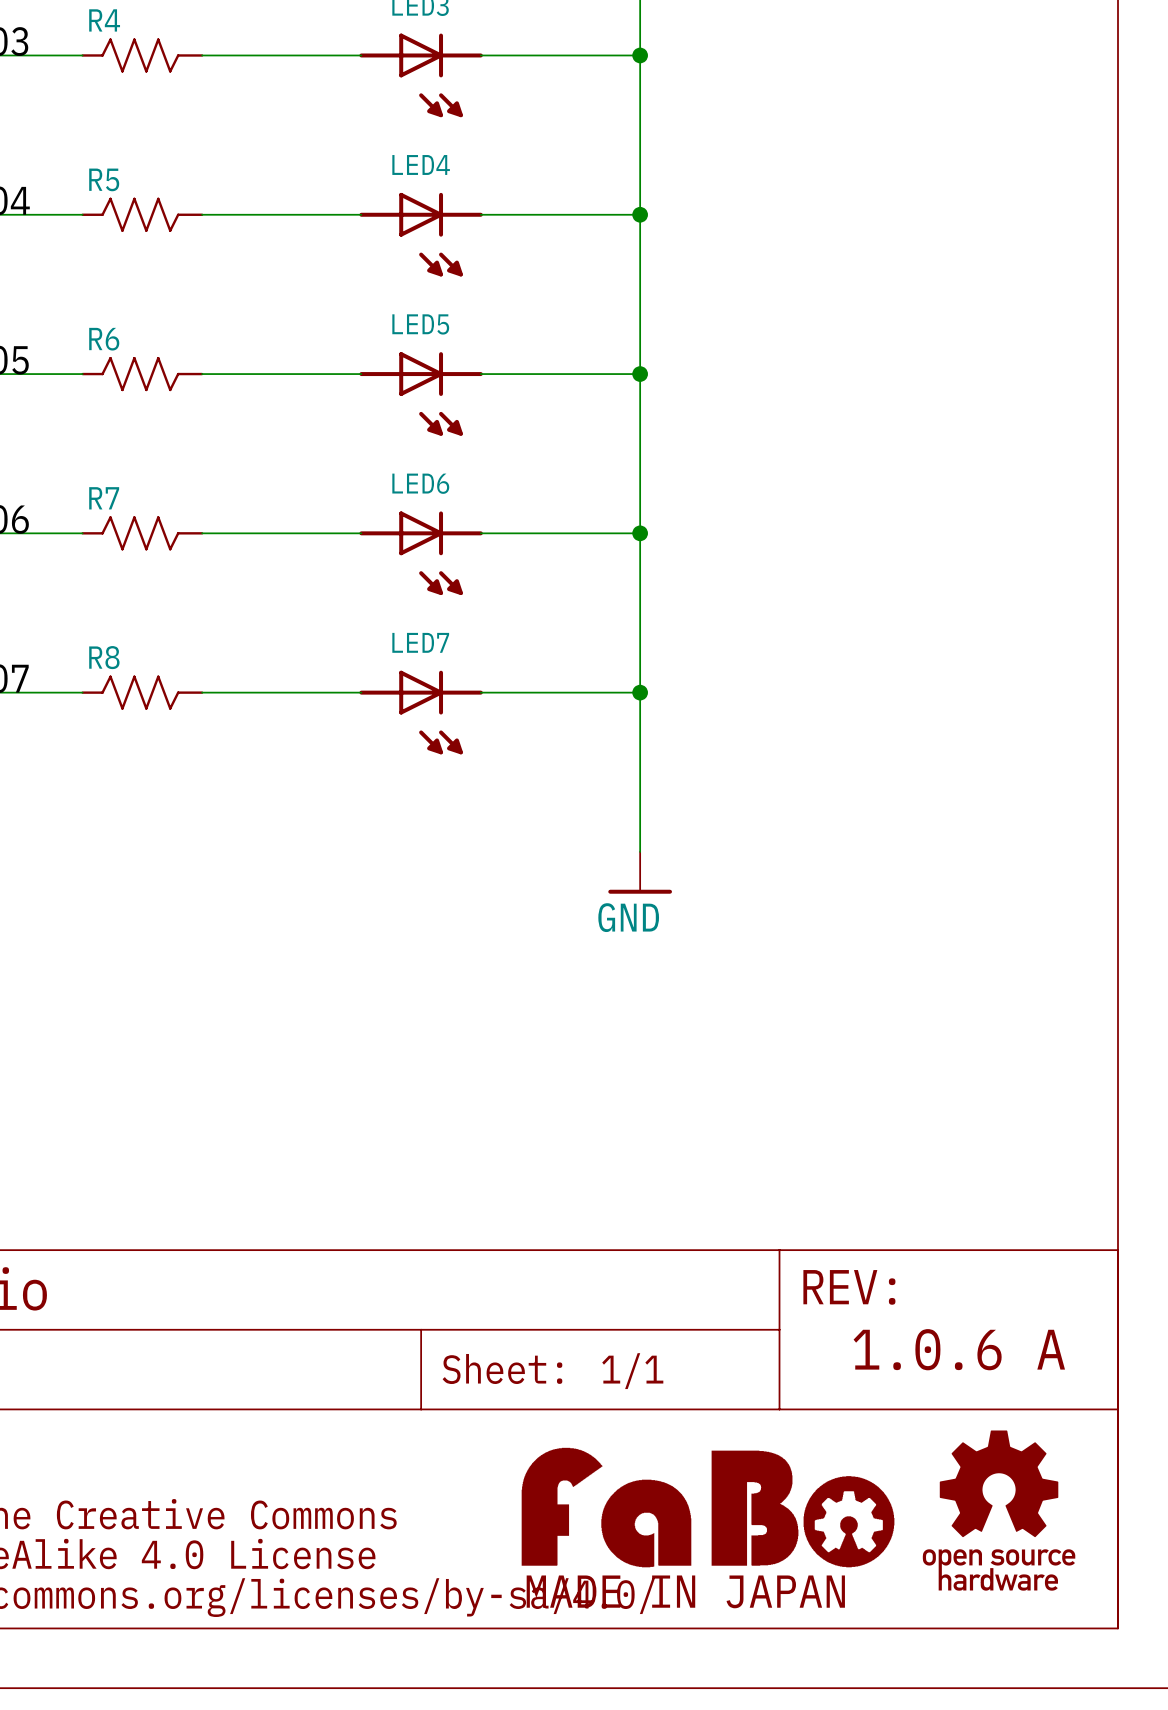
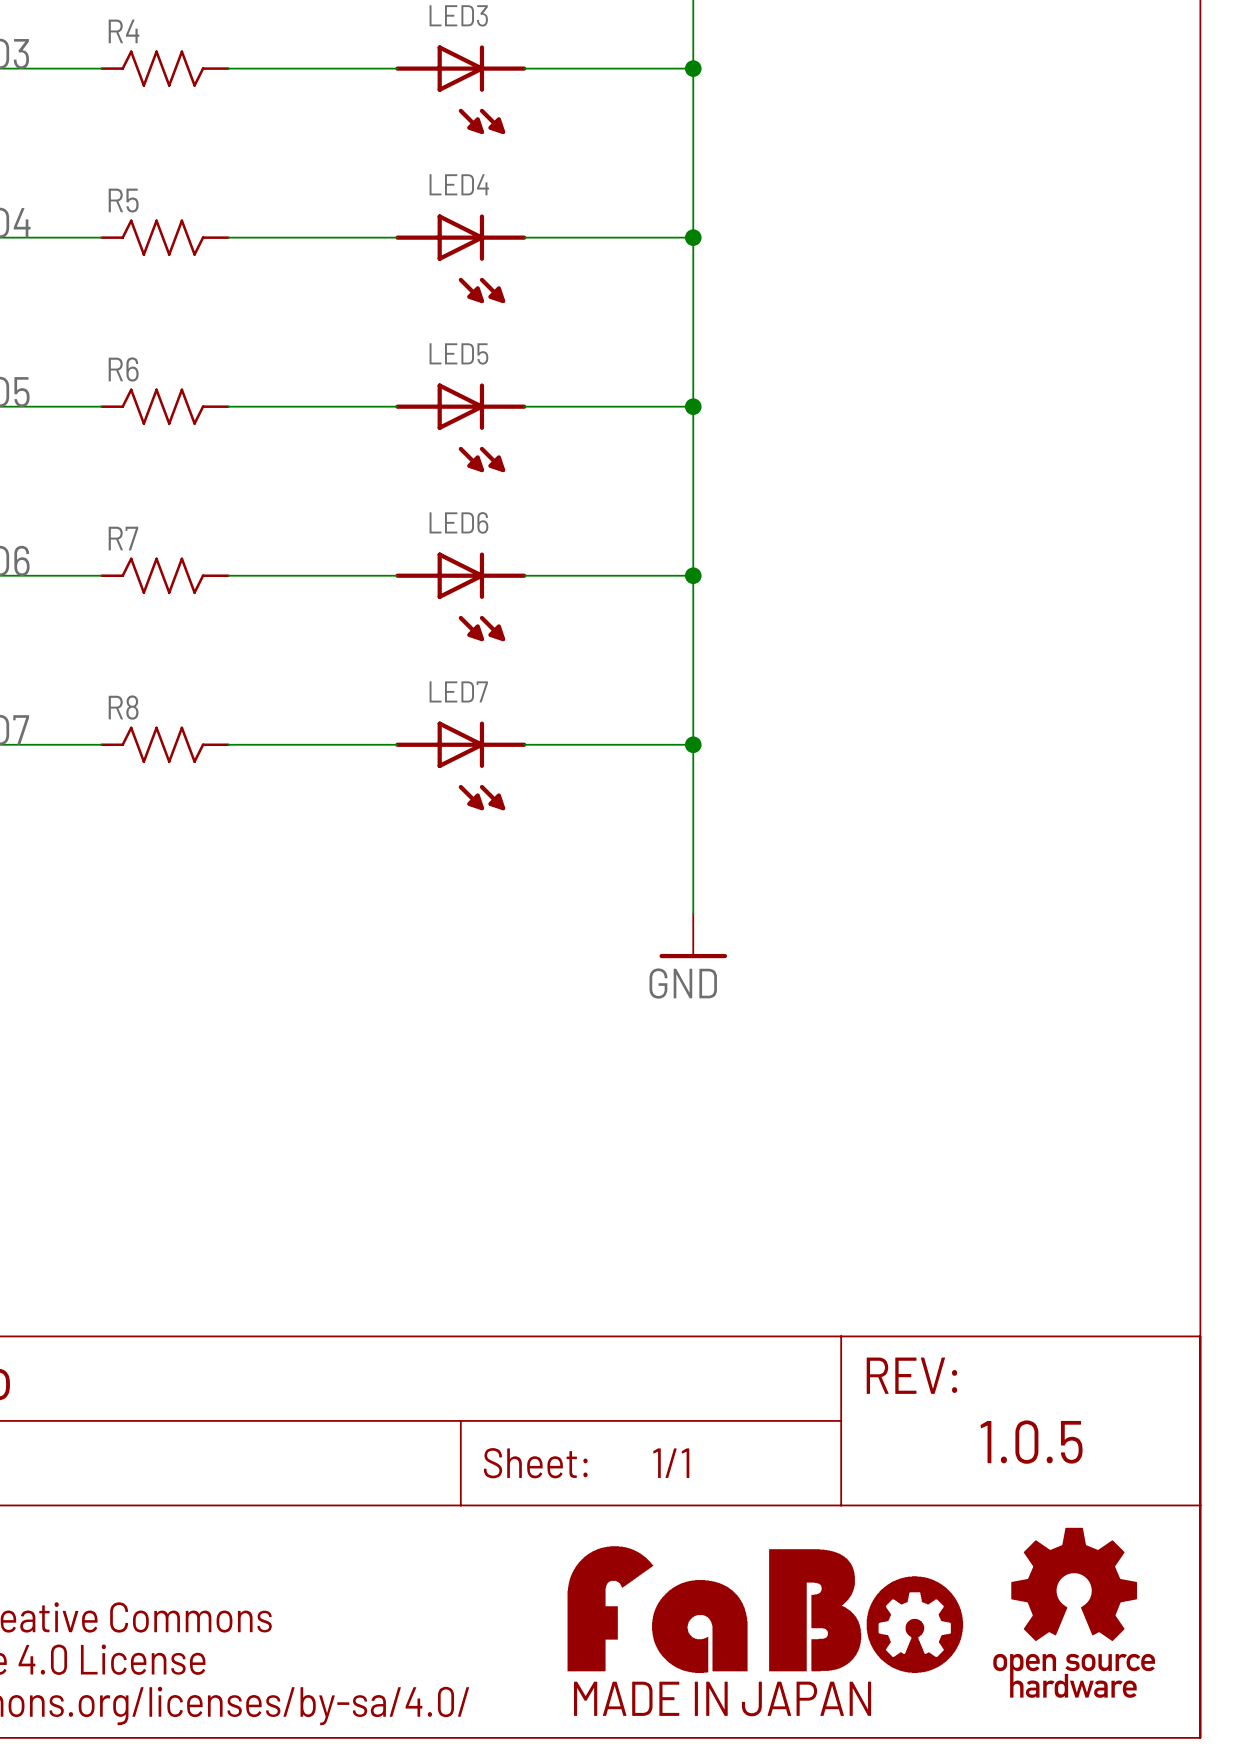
text: 1.0.6 A (959, 1349) -> 1.0.5 (1031, 1442)

